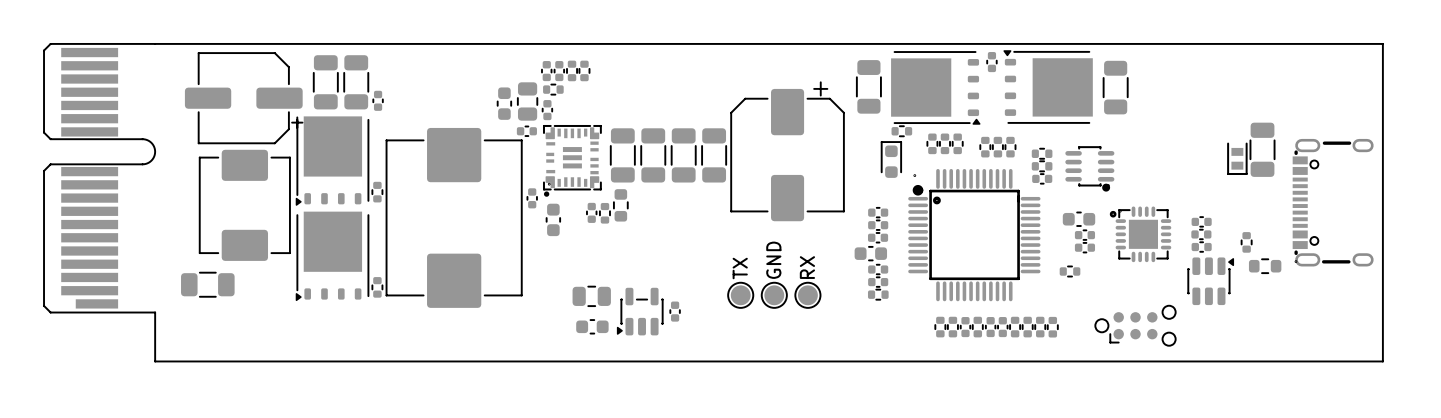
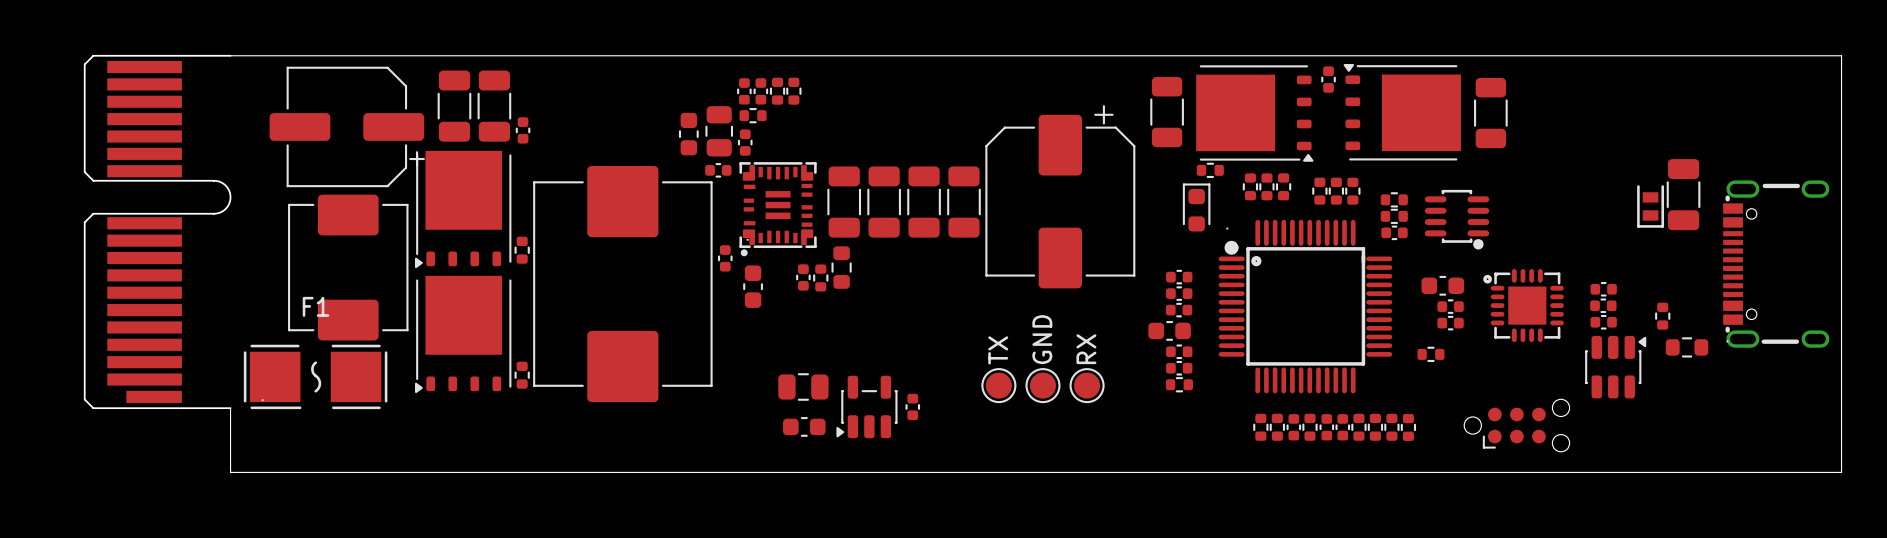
part: (207, 284) -> none
F1: none -> (315, 376)

